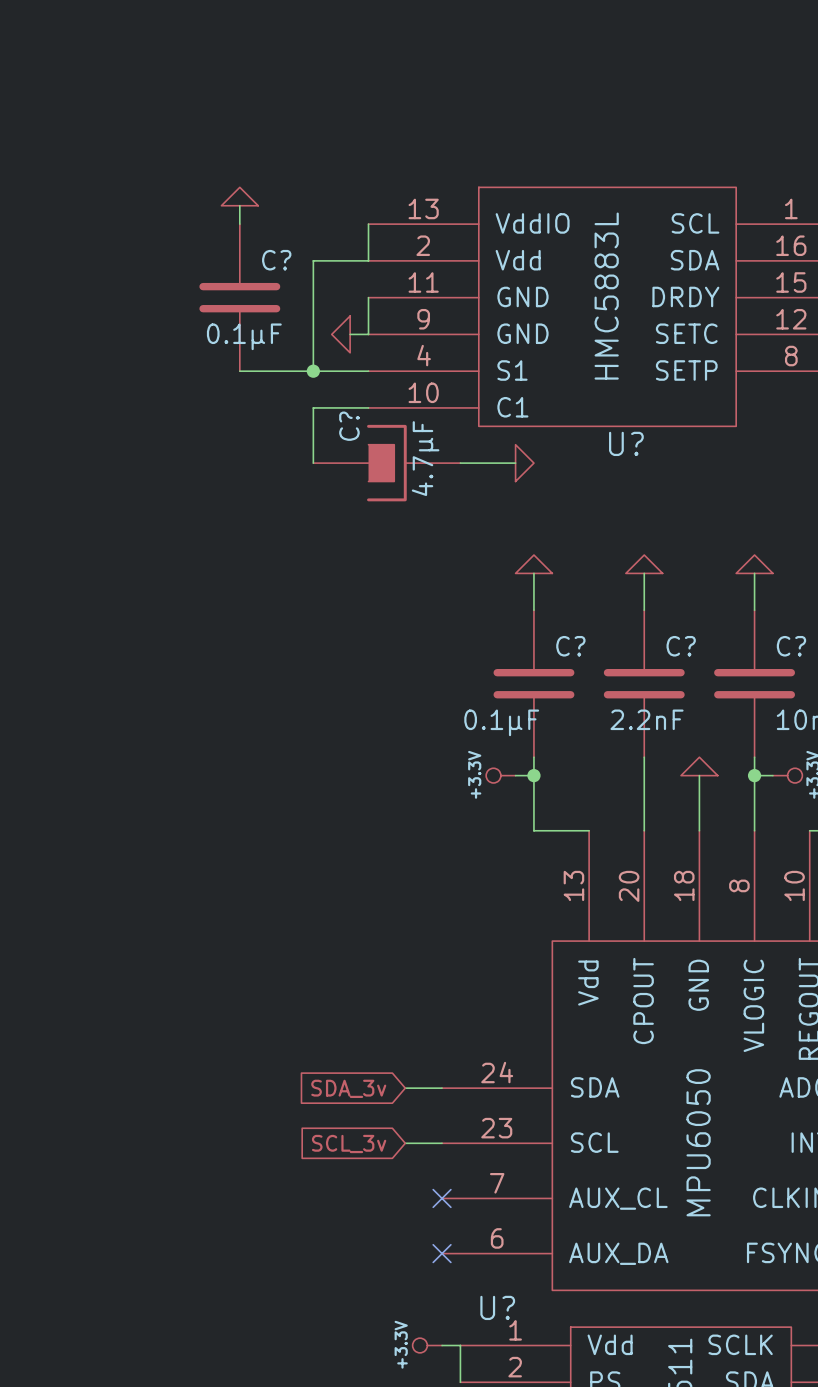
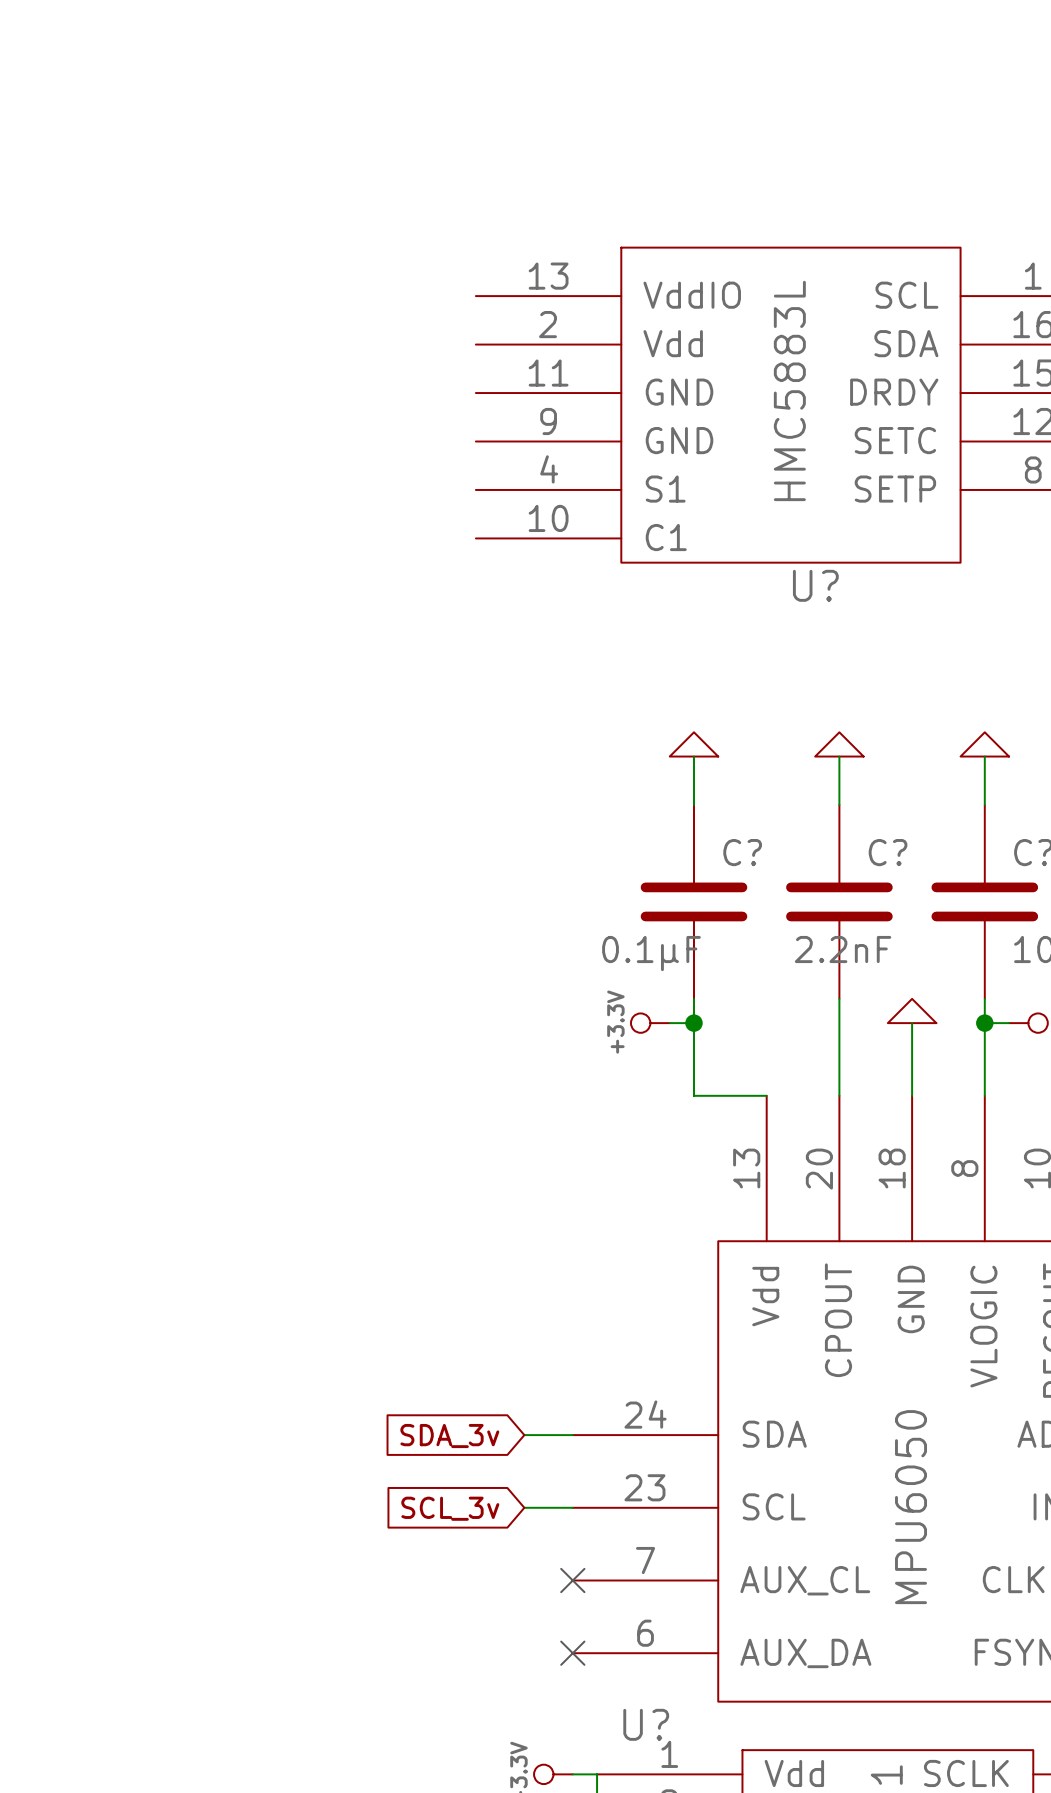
power symbol: (239, 196) -> none
wire: (239, 205) (239, 224) -> none
wire: (368, 224) (368, 260) (313, 260) (313, 371) -> none
C?: 0.1µF (239, 297) -> none
wire: (368, 297) (368, 334) (350, 334) -> none
power symbol: (340, 334) -> none
wire: (239, 371) (368, 371) -> none
junction: (313, 371) -> none
wire: (368, 407) (313, 407) (313, 463) -> none
C?: 4.7µF (386, 463) -> none
wire: (460, 463) (515, 463) -> none
power symbol: (524, 463) -> none

